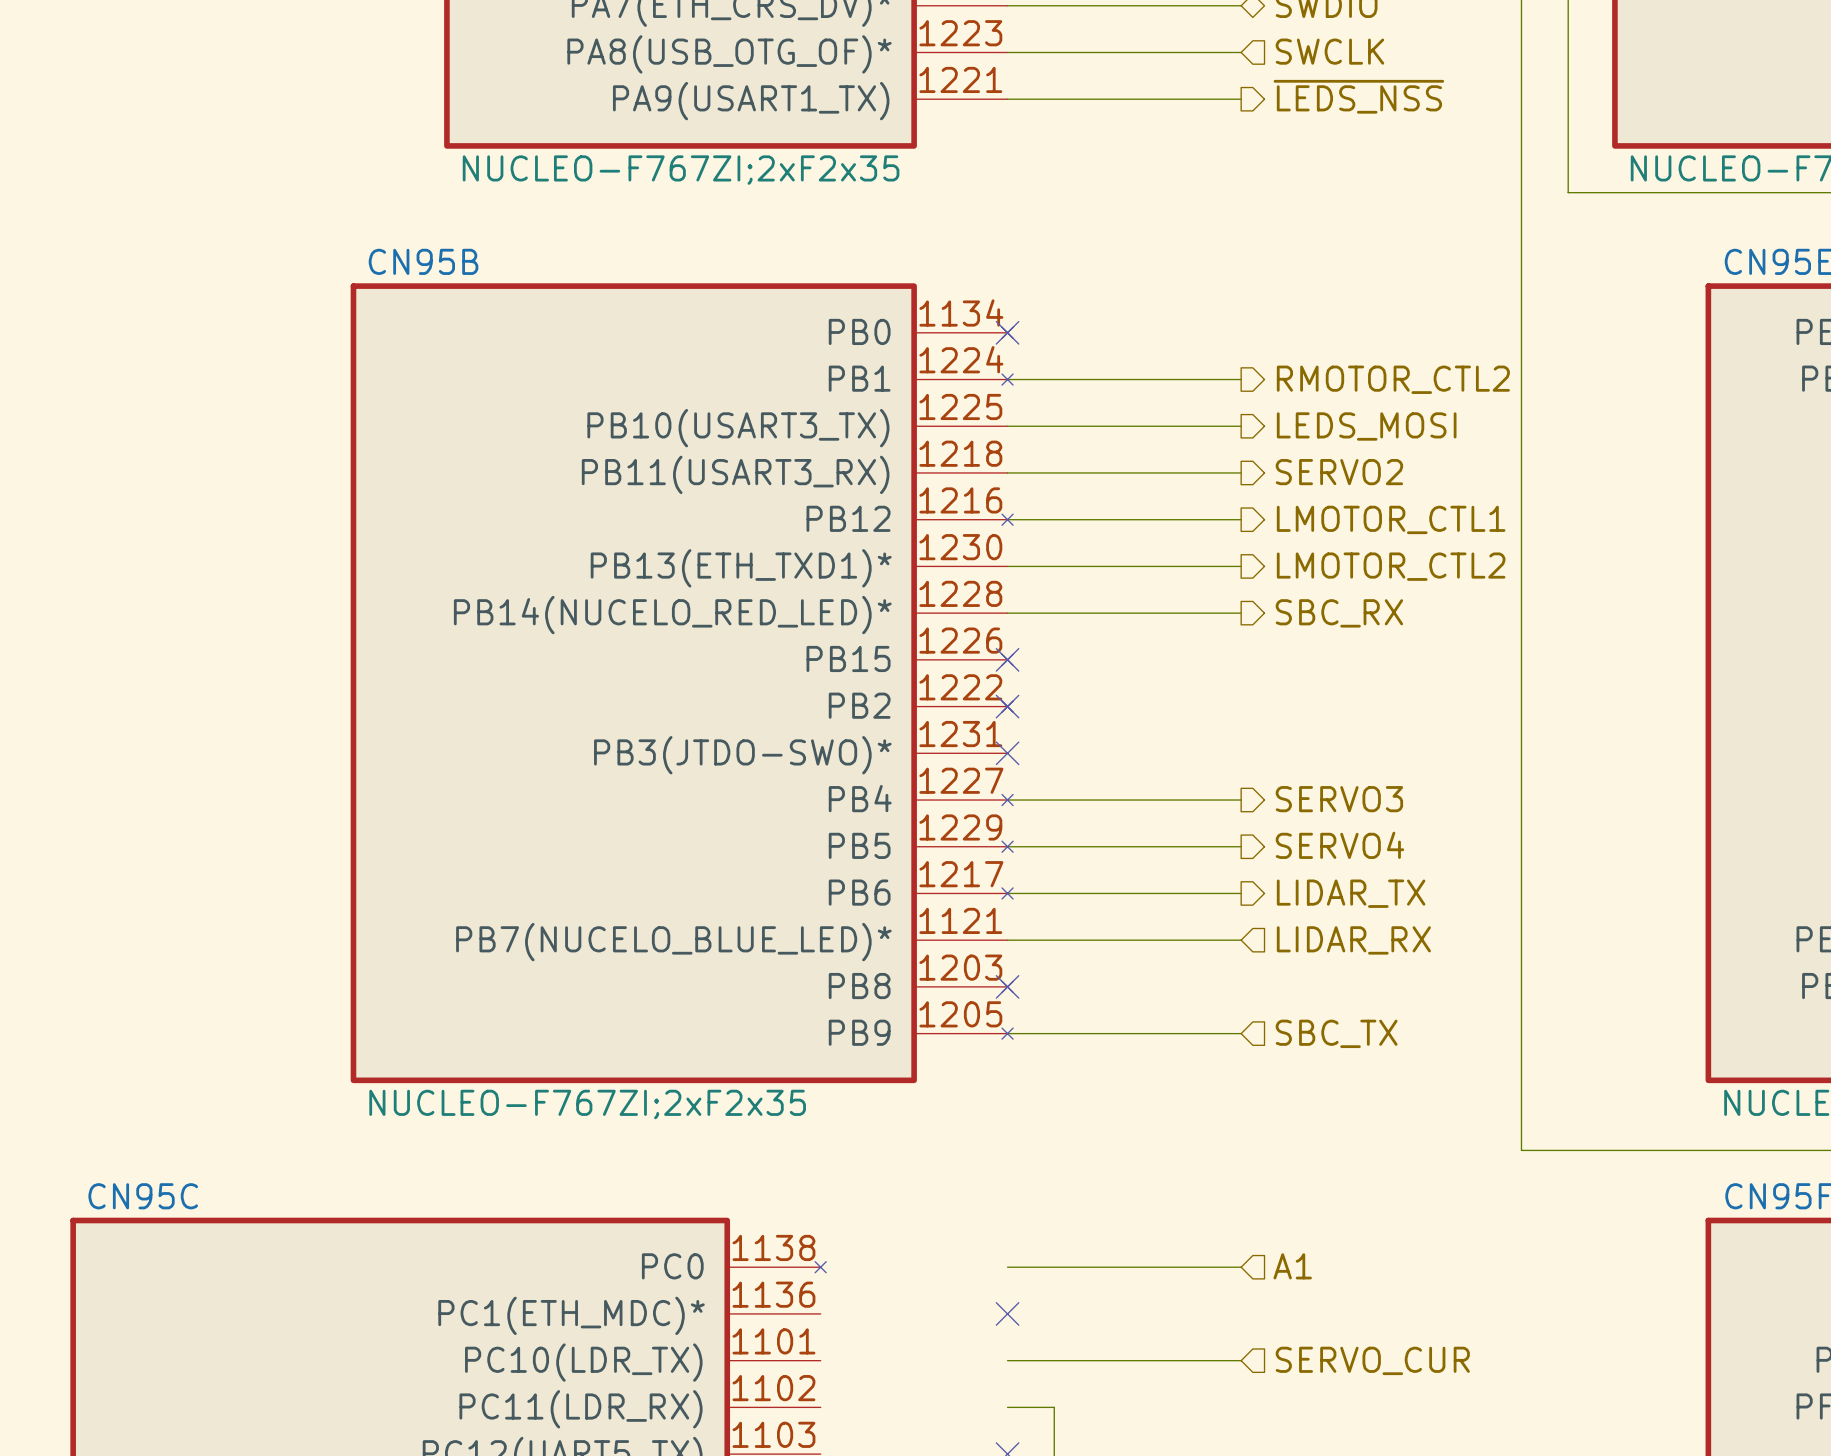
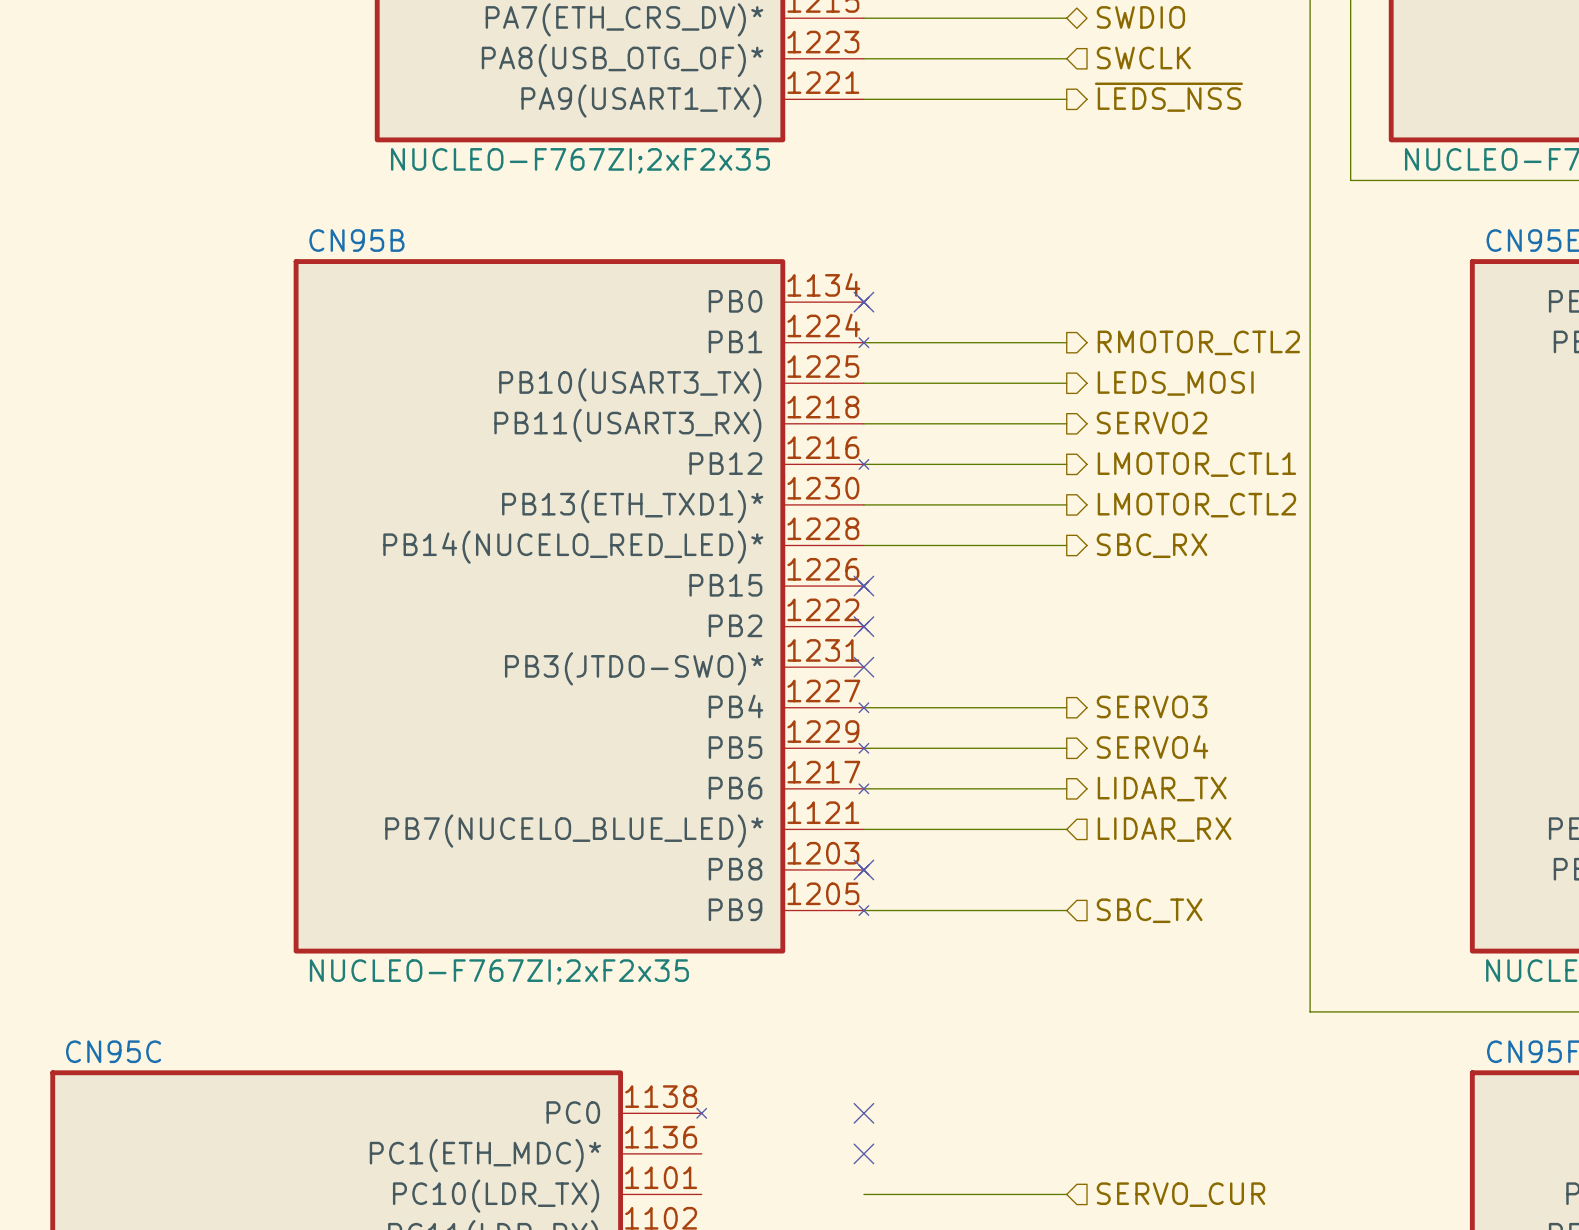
hierarchical label: A1 (1292, 1266) -> none
wire: (1007, 1267) (1241, 1267) -> none
no-connect mark: none -> (863, 1113)

